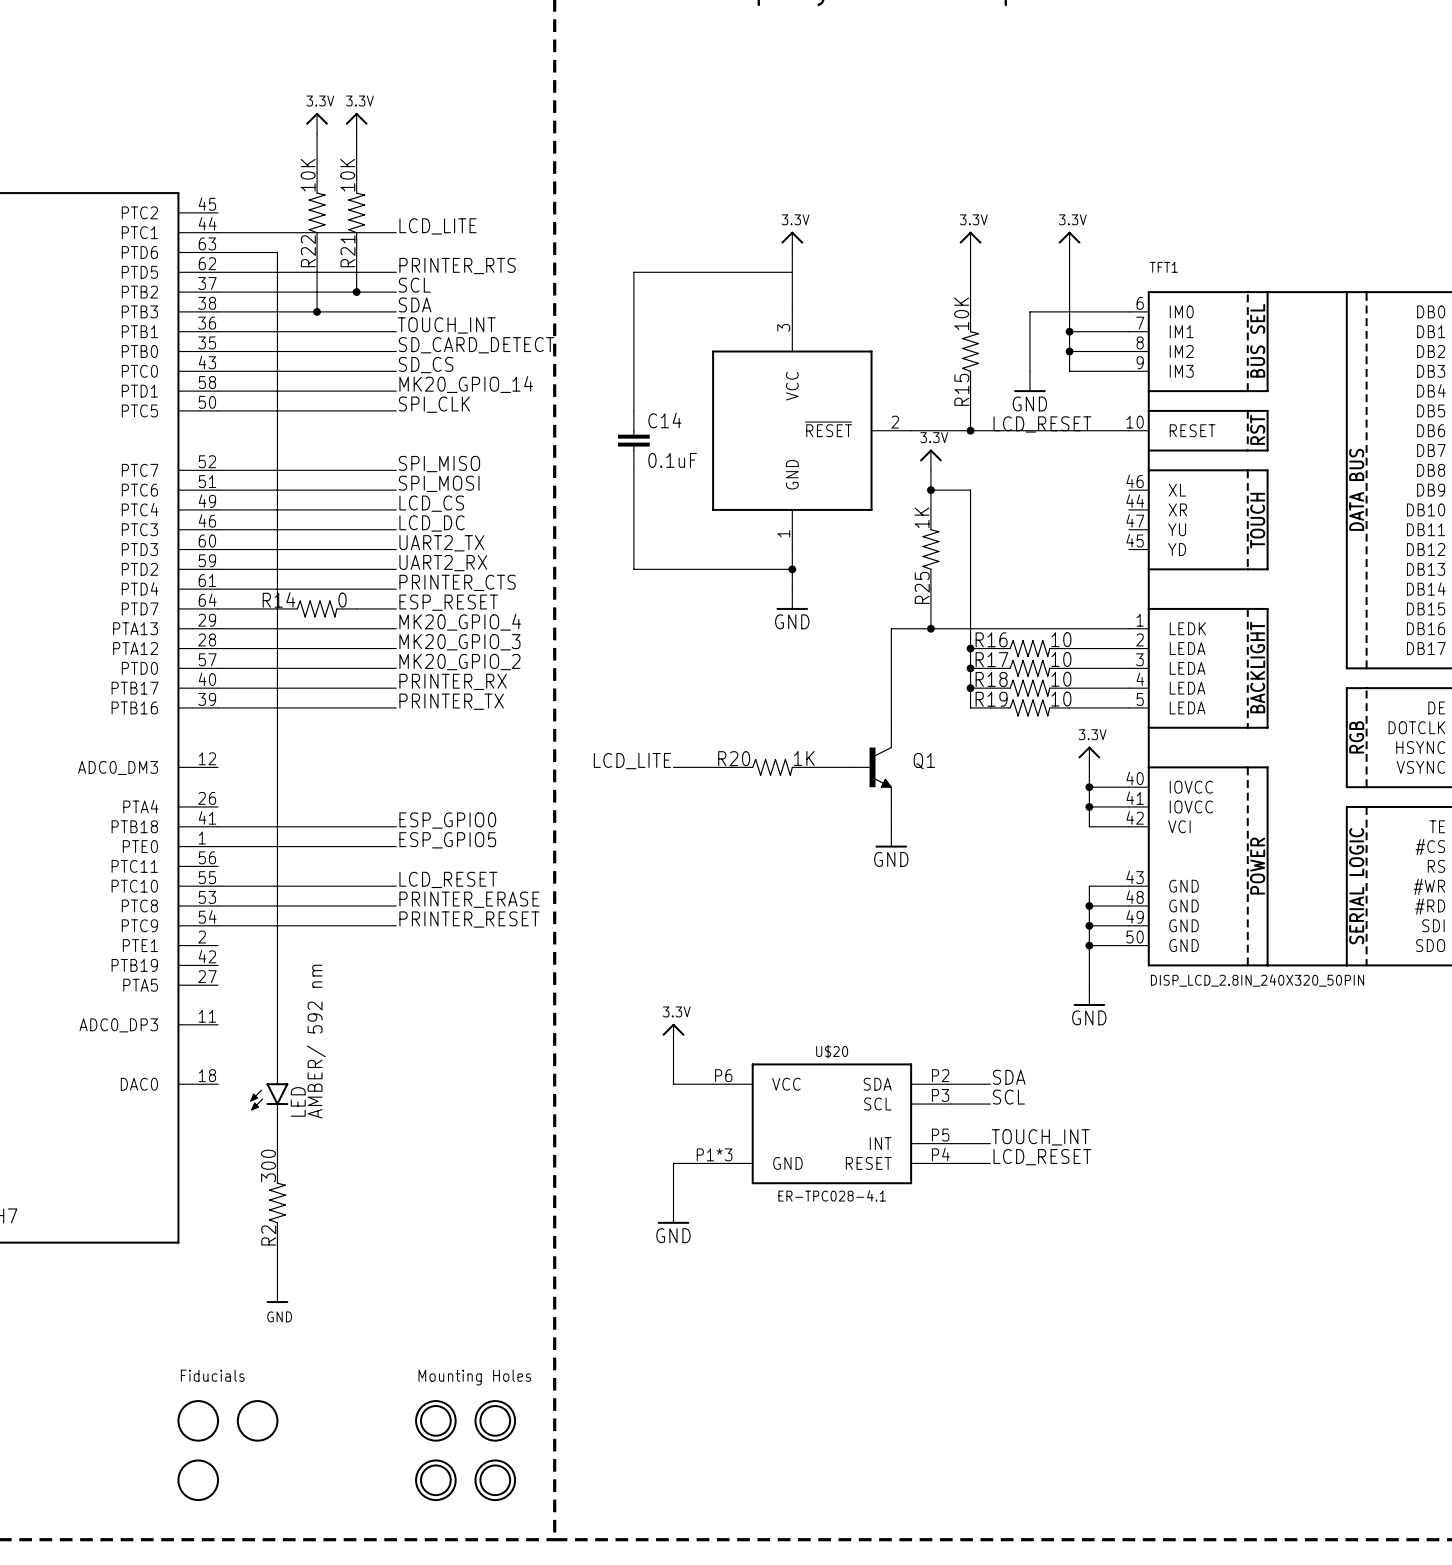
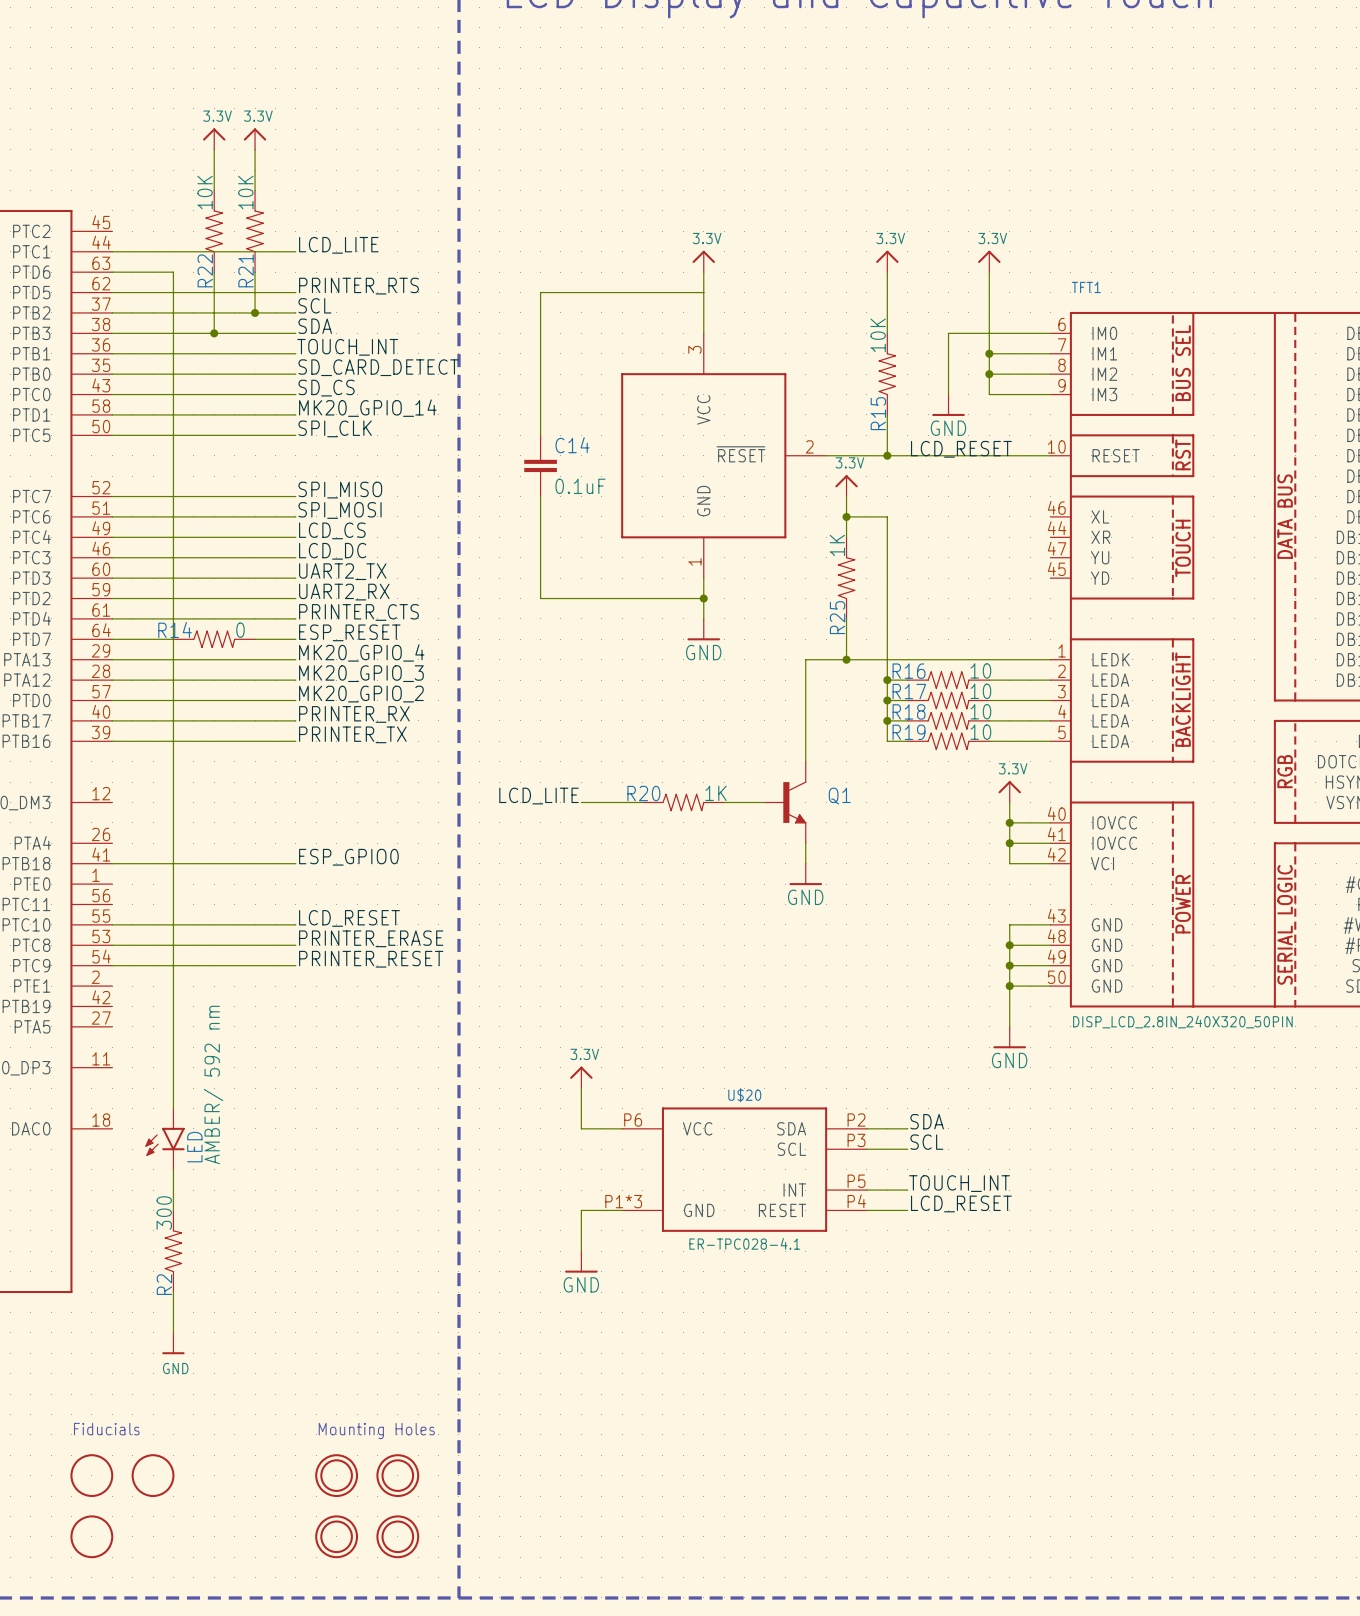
label: ESP_GPIO5 (447, 840) -> none
wire: (218, 846) (396, 846) -> none

